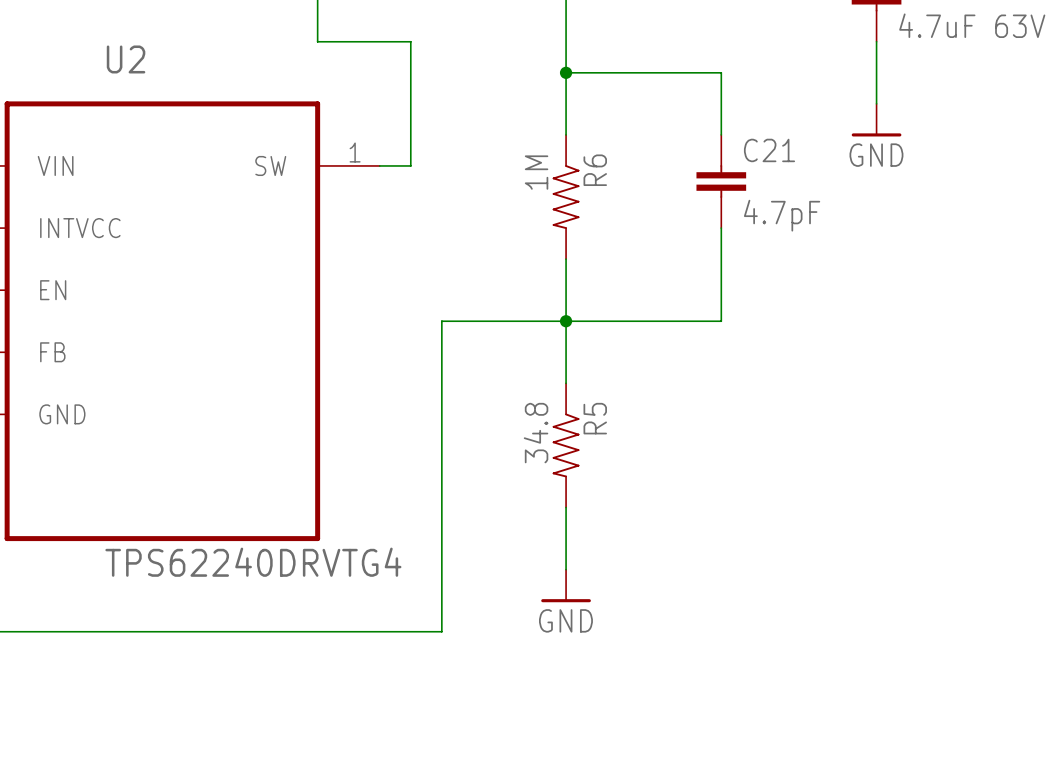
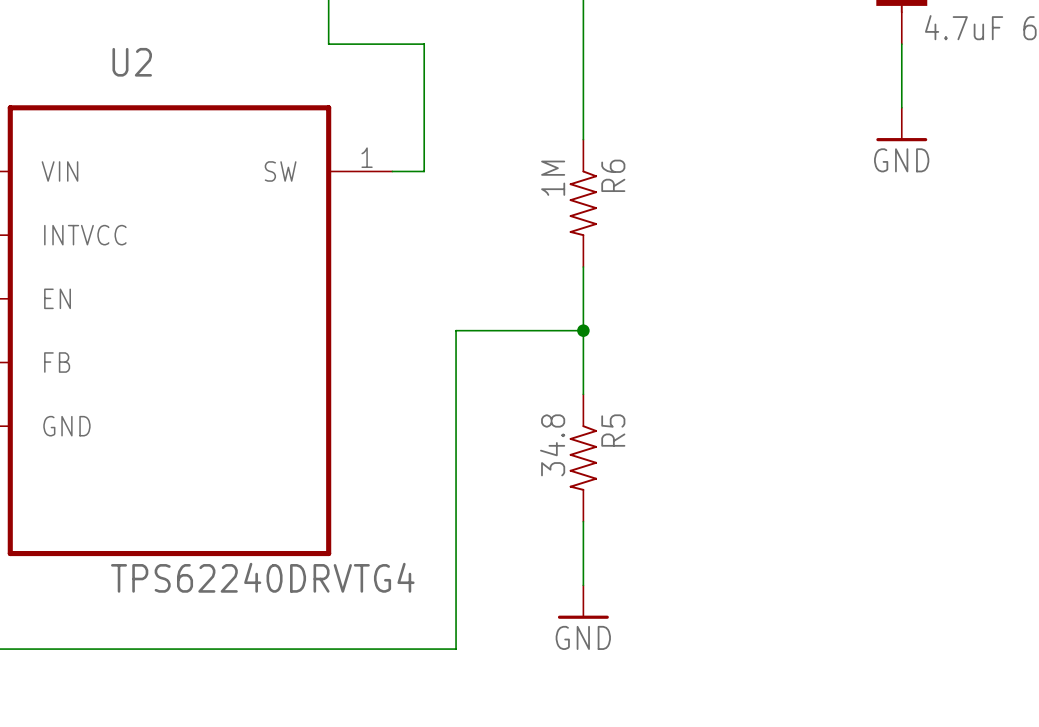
wire: (566, 72) (721, 72) (721, 134) -> none
junction: (566, 72) -> none
C21: 4.7pF (721, 181) -> none
wire: (721, 228) (721, 321) (566, 321) -> none

